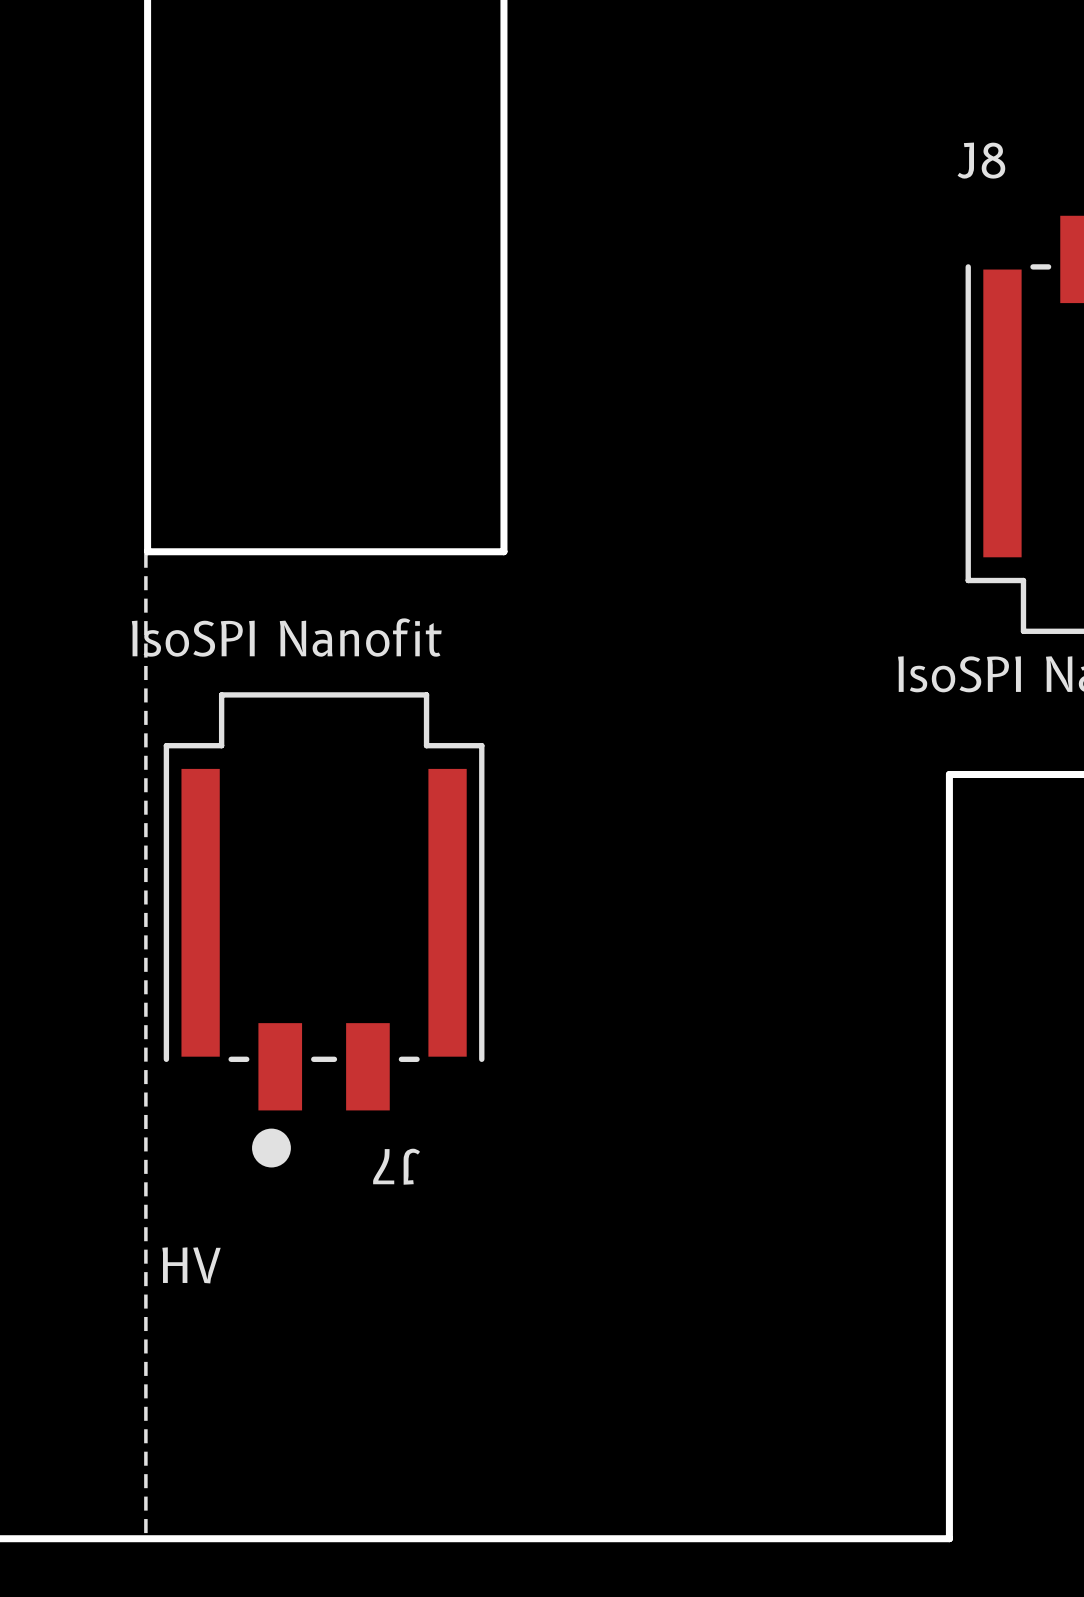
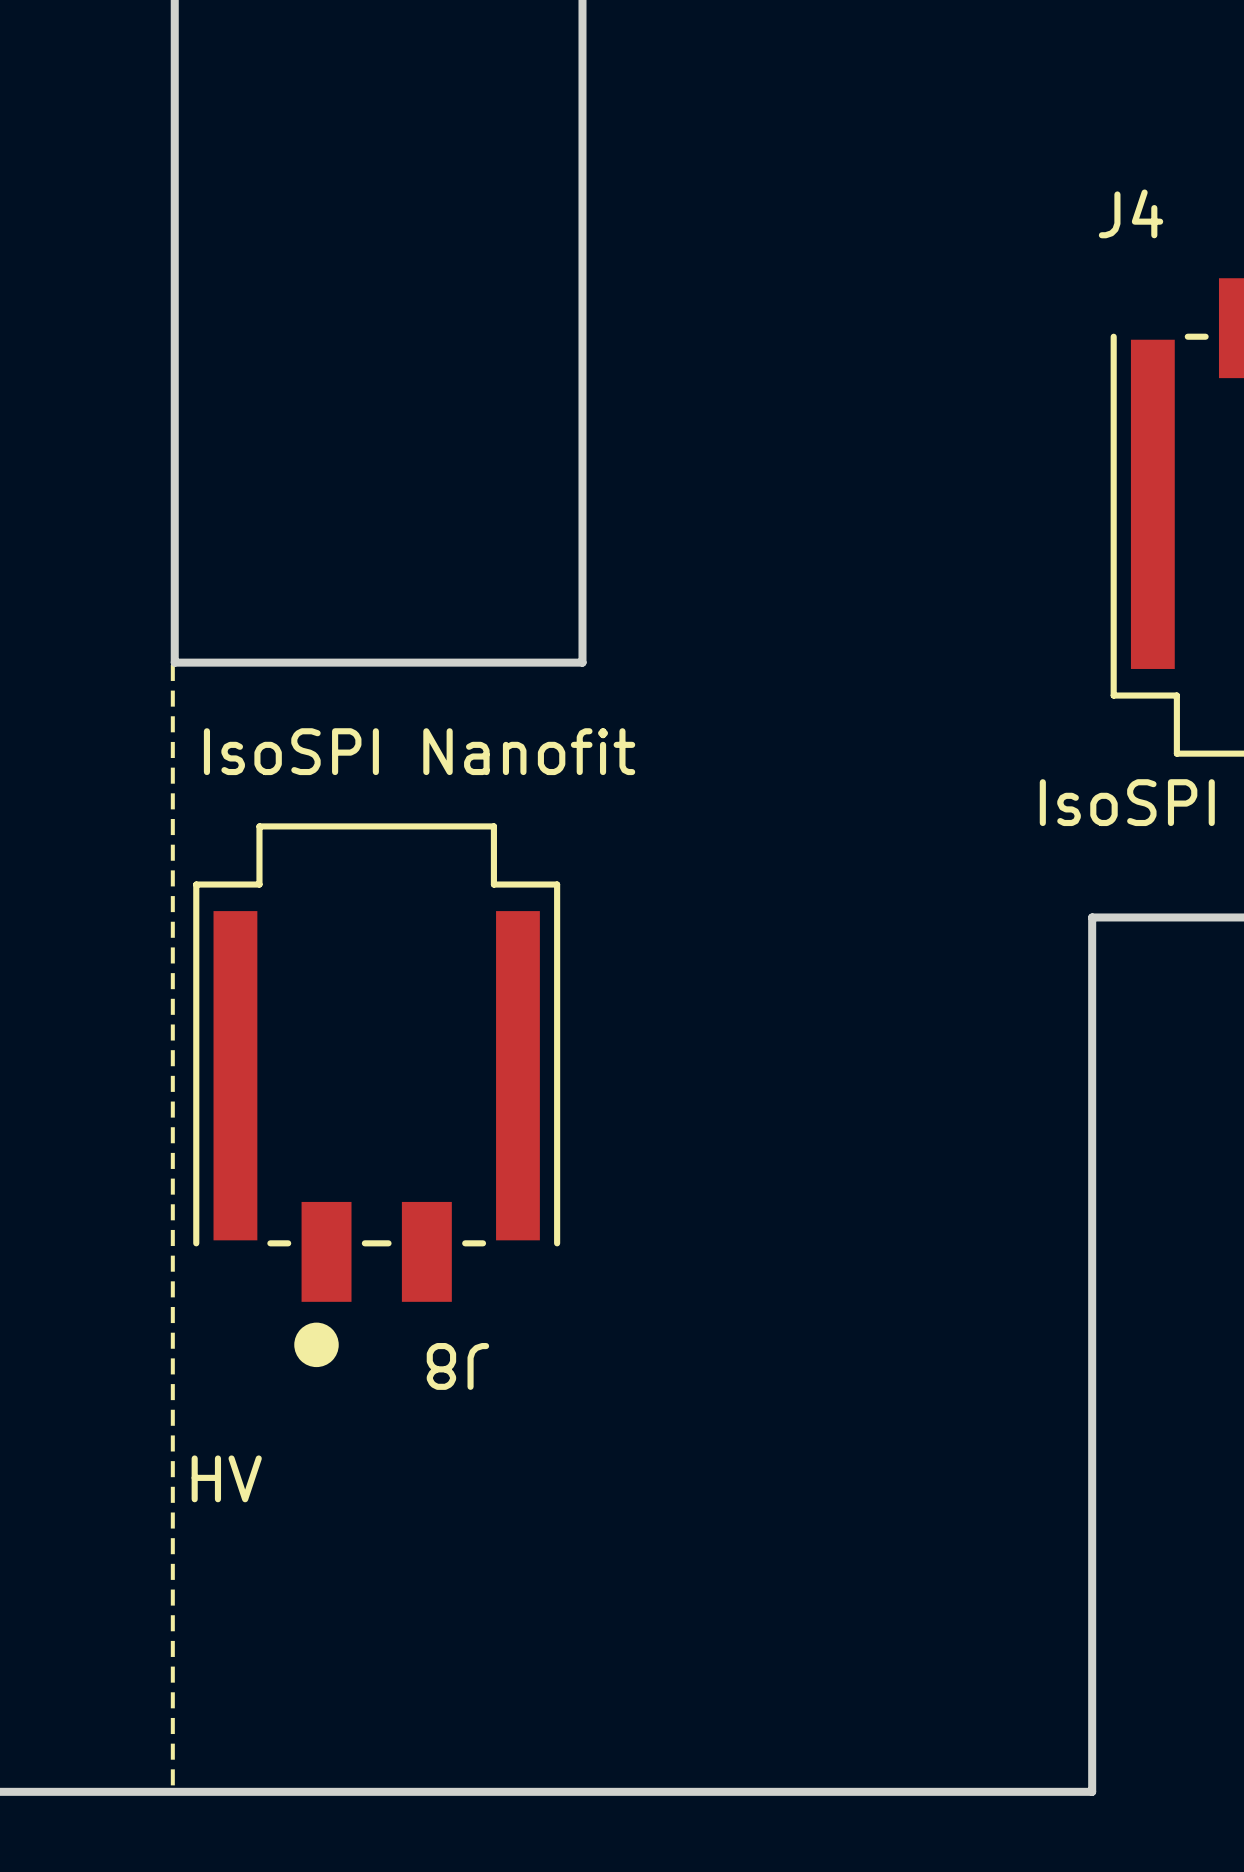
J8 name: J8 (981, 160) -> J4 (1131, 213)
text position: IsoSPI Nanofit (286, 637) -> IsoSPI Nanofit (419, 751)
J7 name: J7 (396, 1166) -> J8 (457, 1366)

